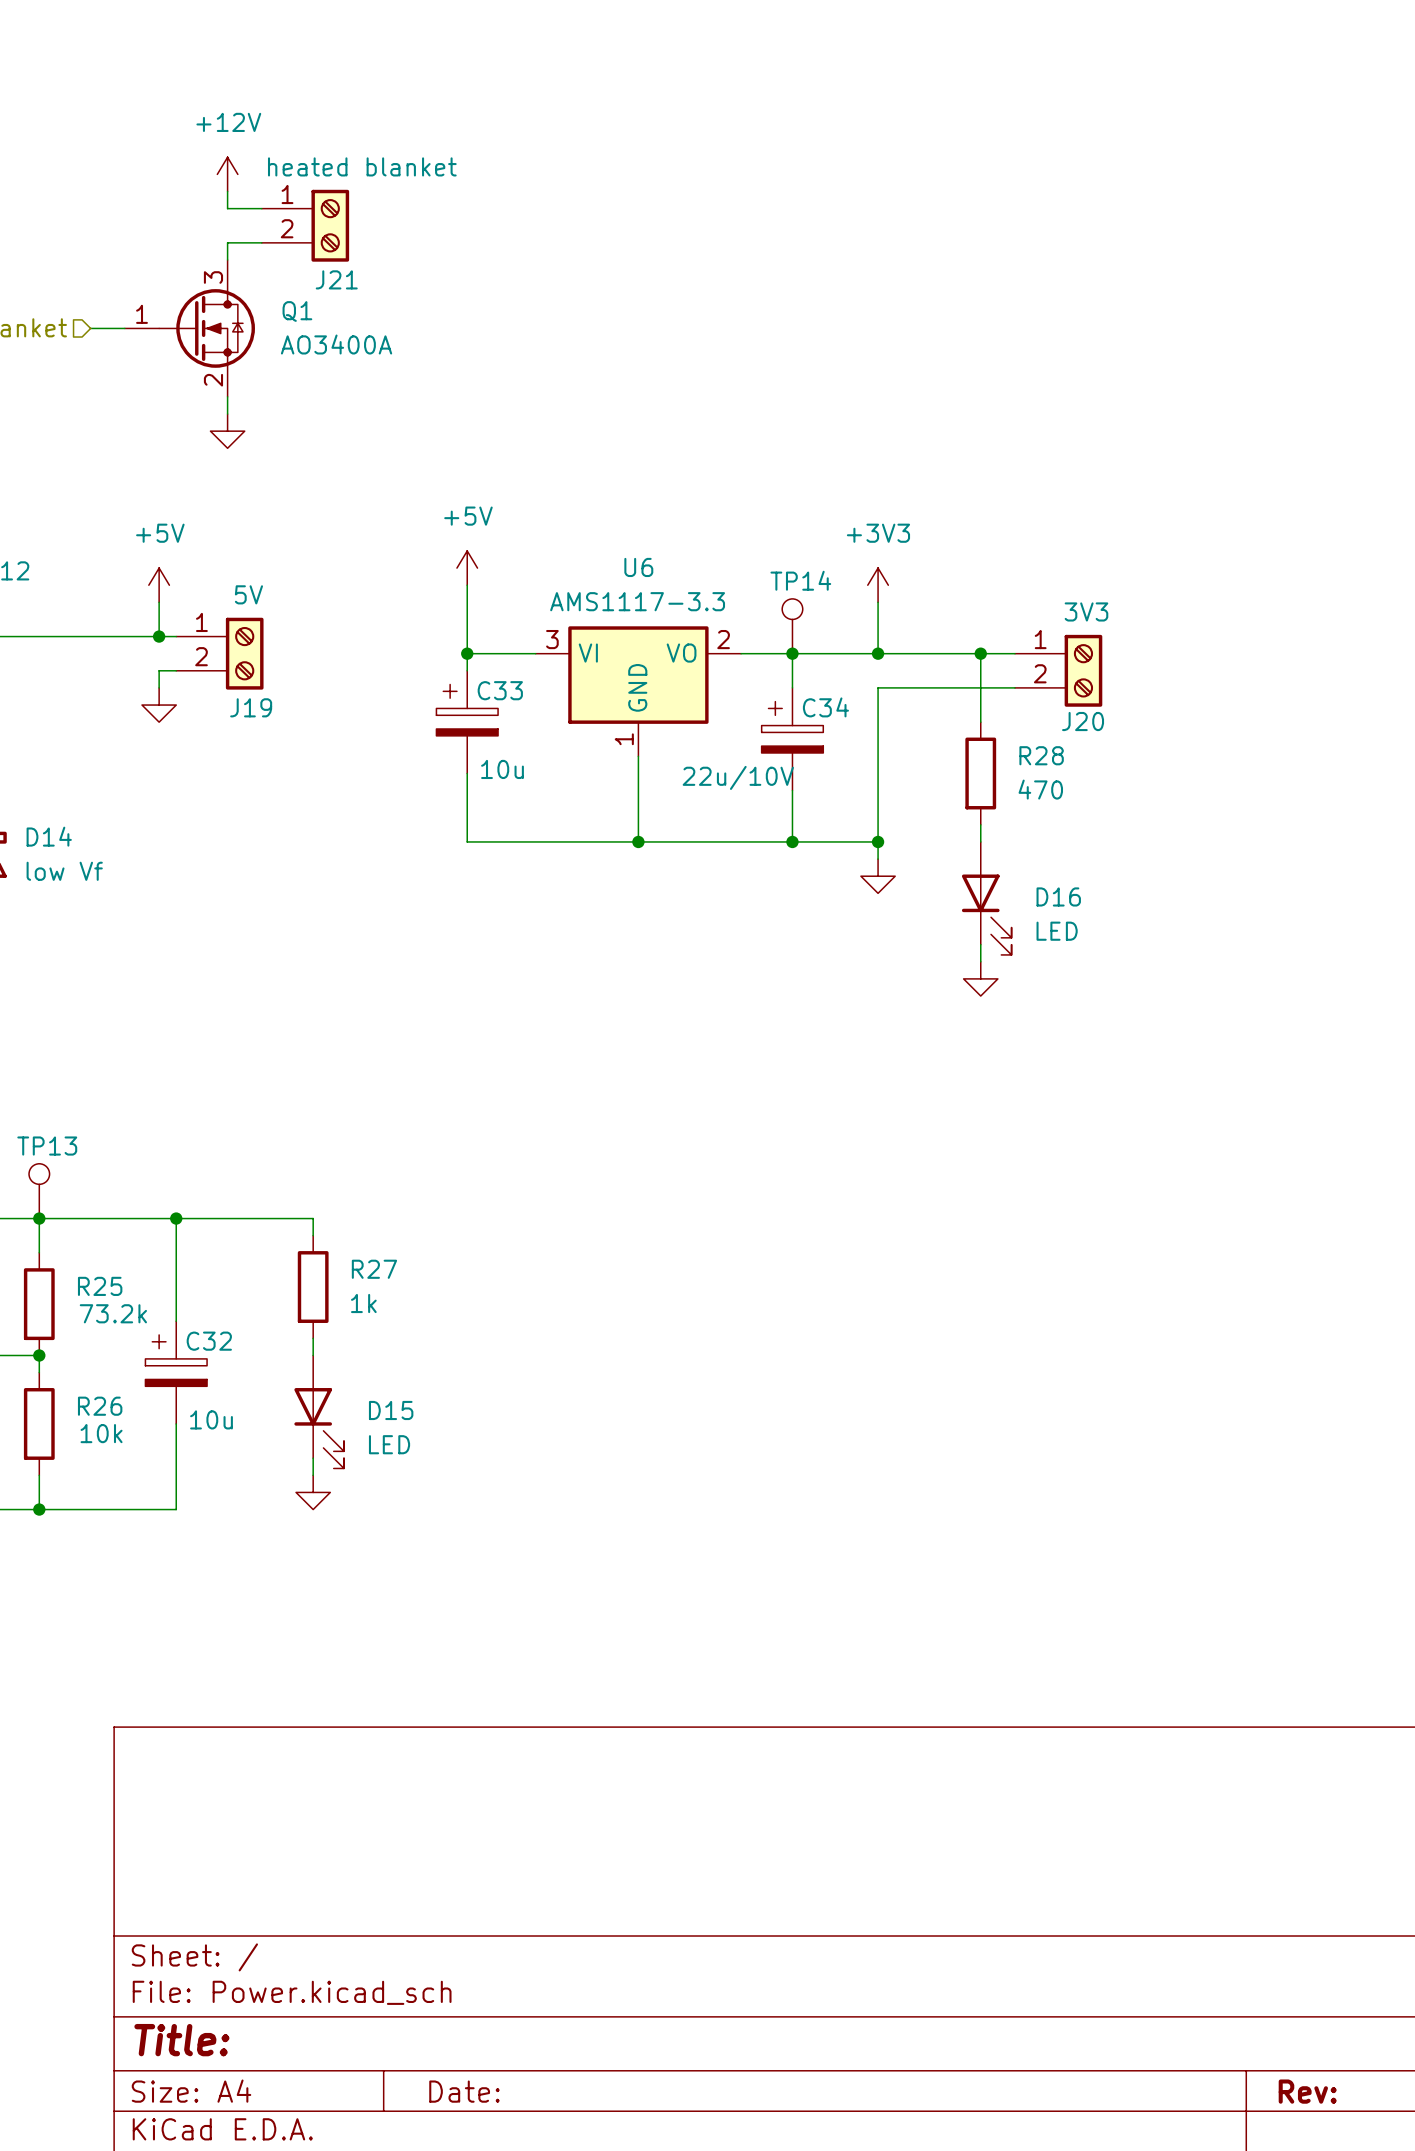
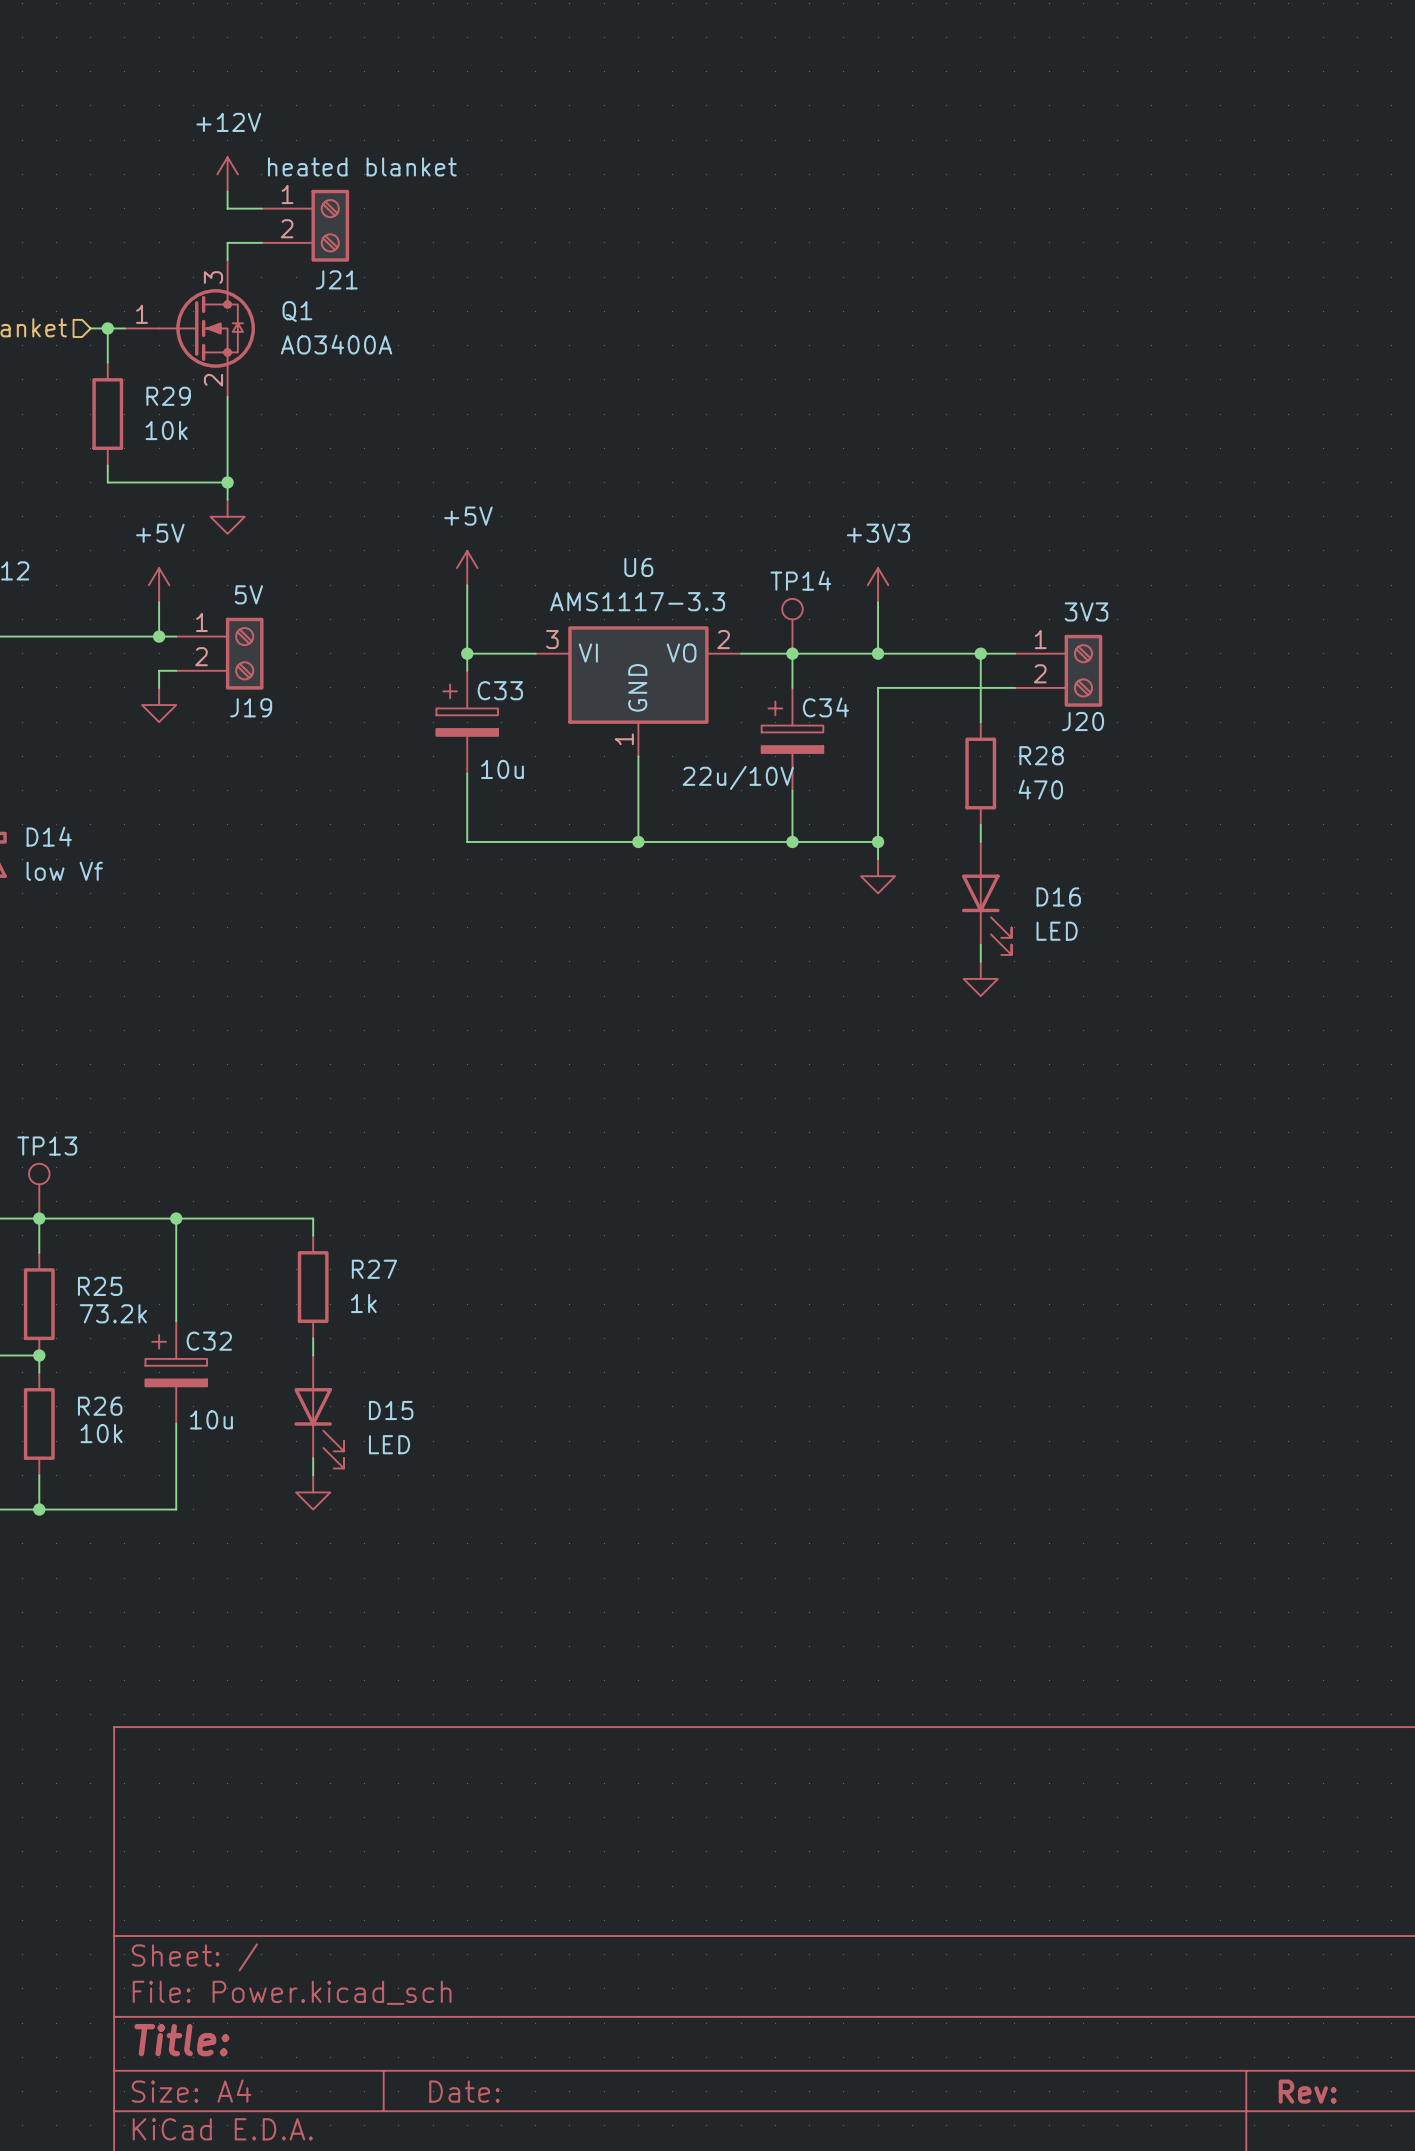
wire: none -> (107, 328) (107, 362)
junction: none -> (107, 328)
R29: none -> 10k (107, 414)
wire: none -> (227, 414) (227, 499)
power symbol position: (227, 431) -> (227, 516)
wire: none -> (107, 465) (107, 482) (227, 482)
junction: none -> (227, 482)

